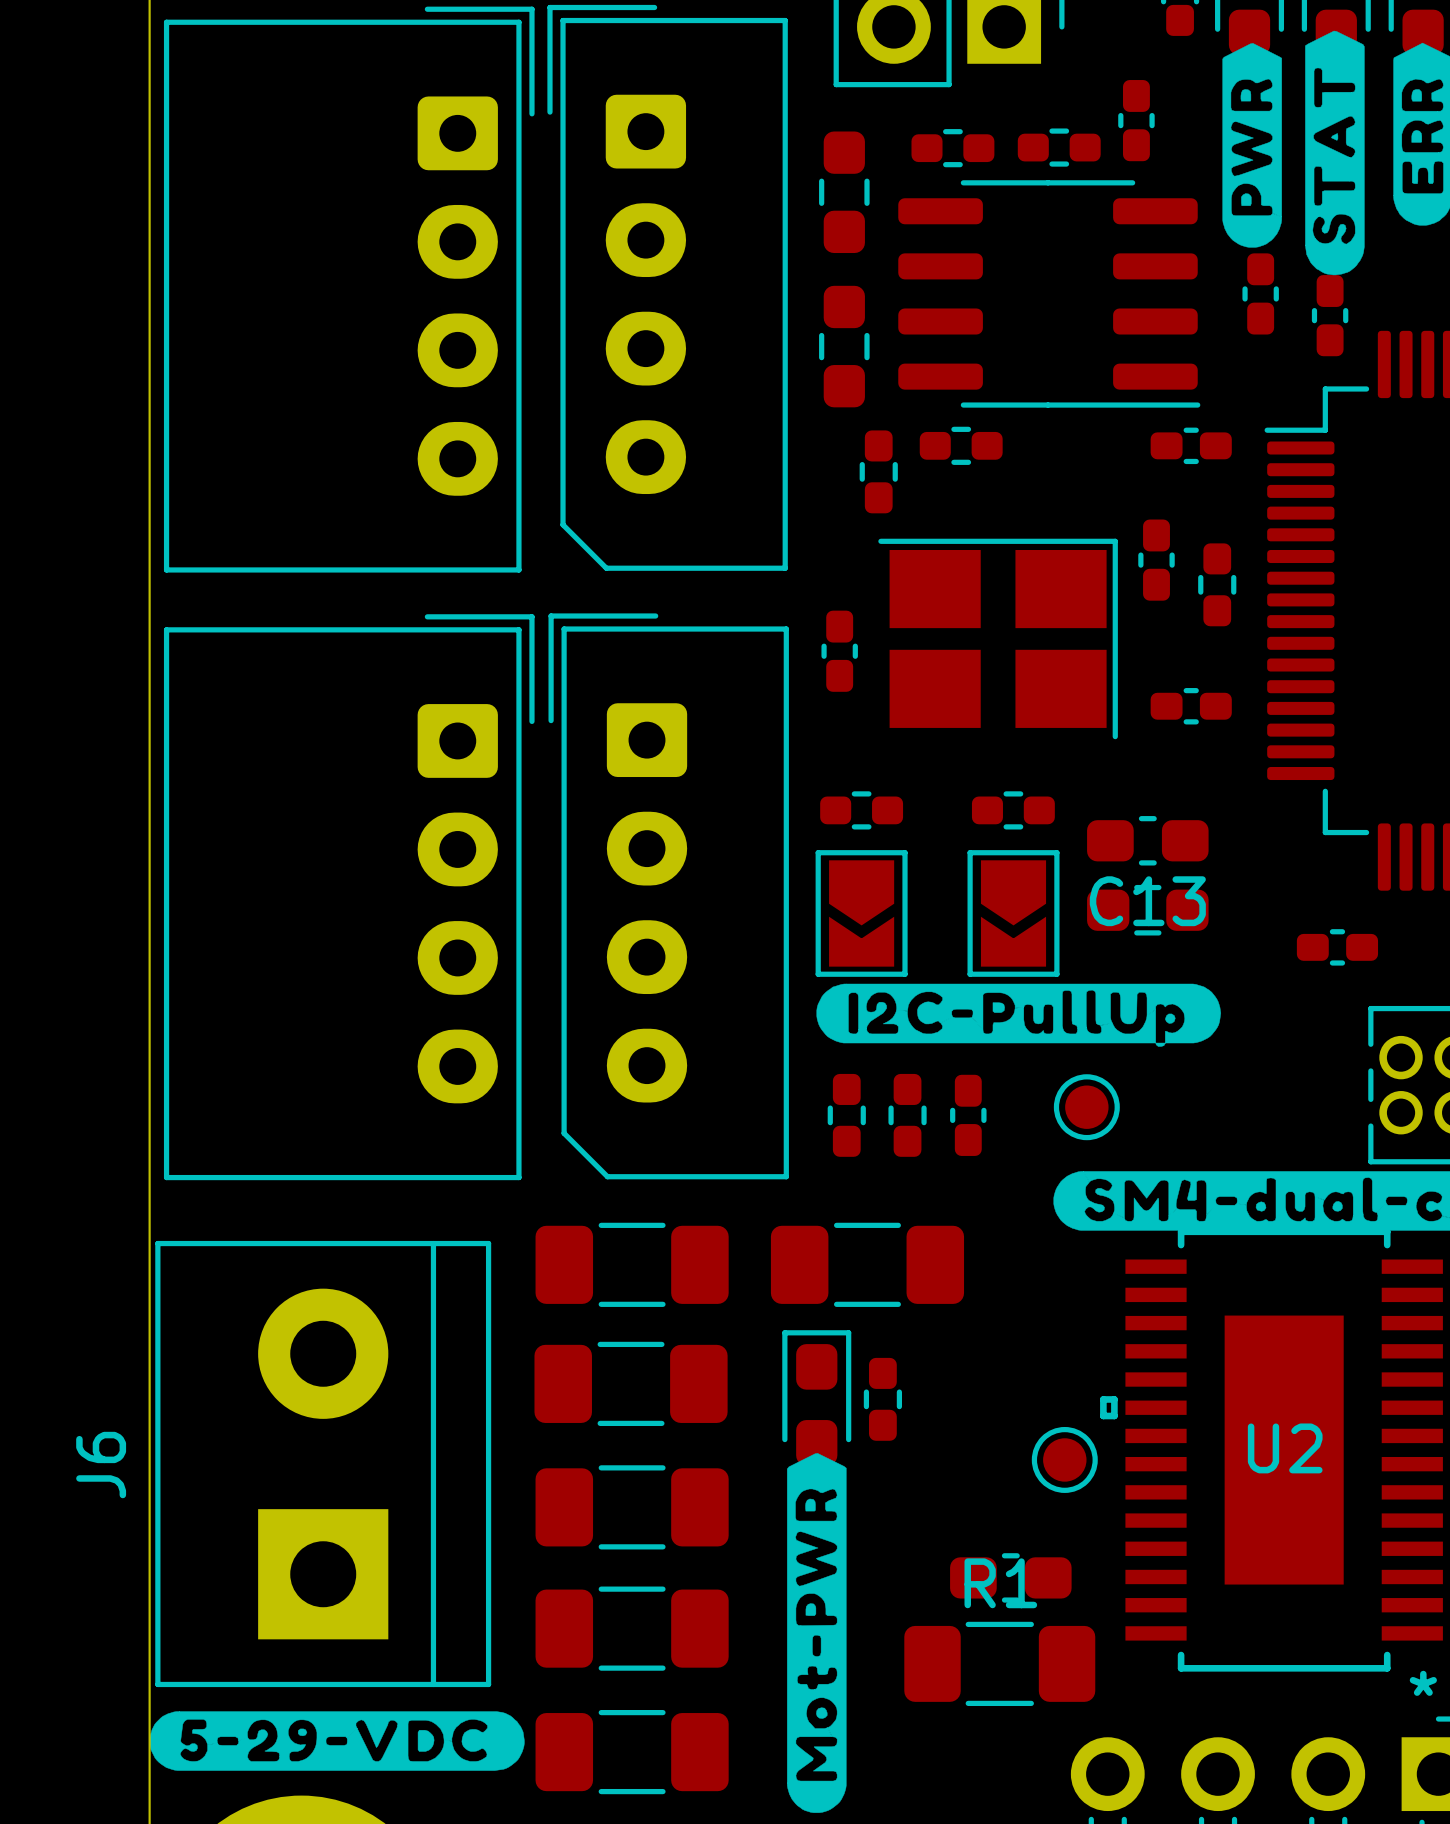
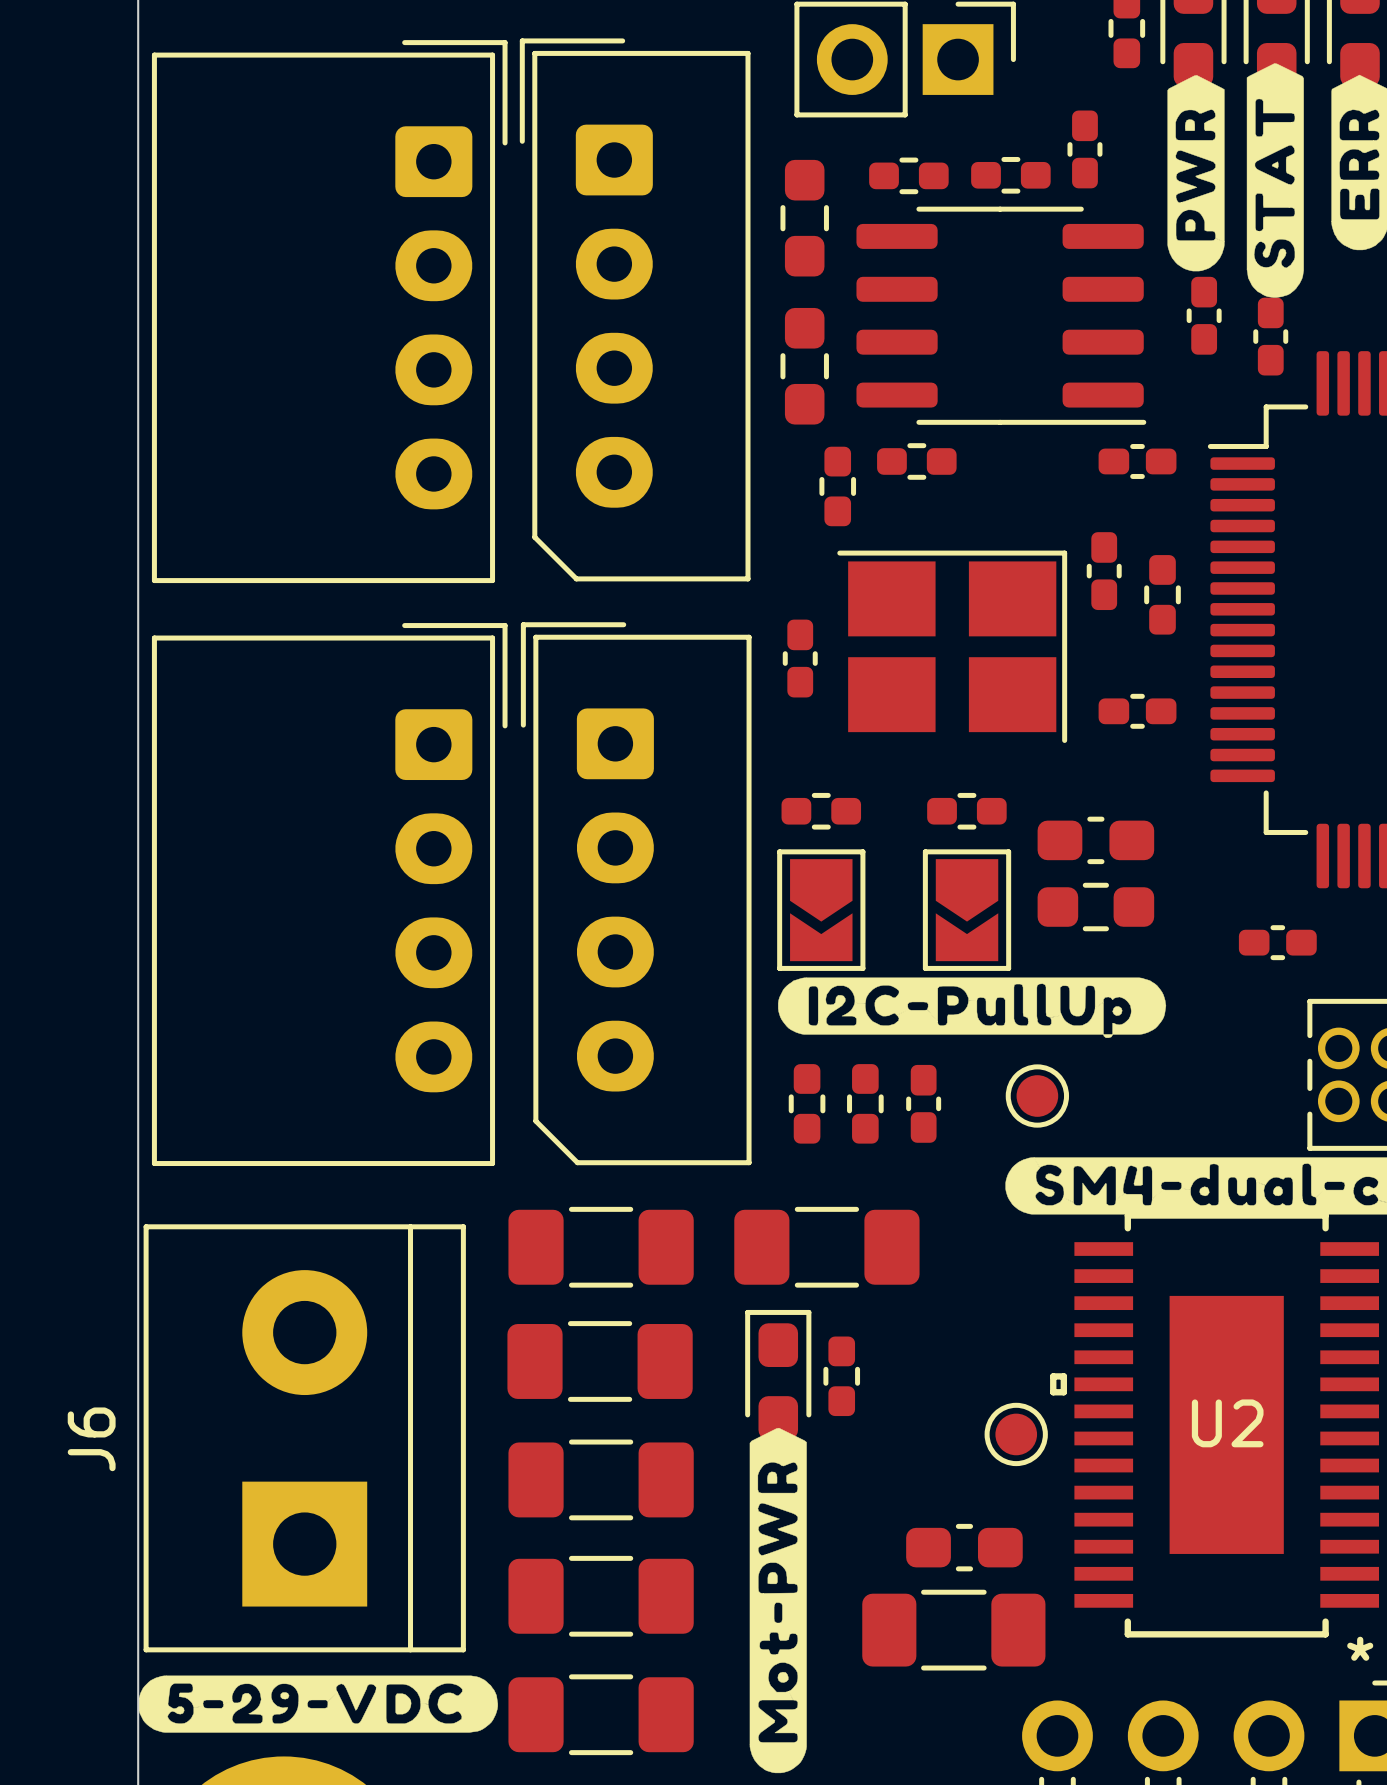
C13 name: C13 (1147, 901) -> none
R1 name: R1 (1000, 1583) -> none

